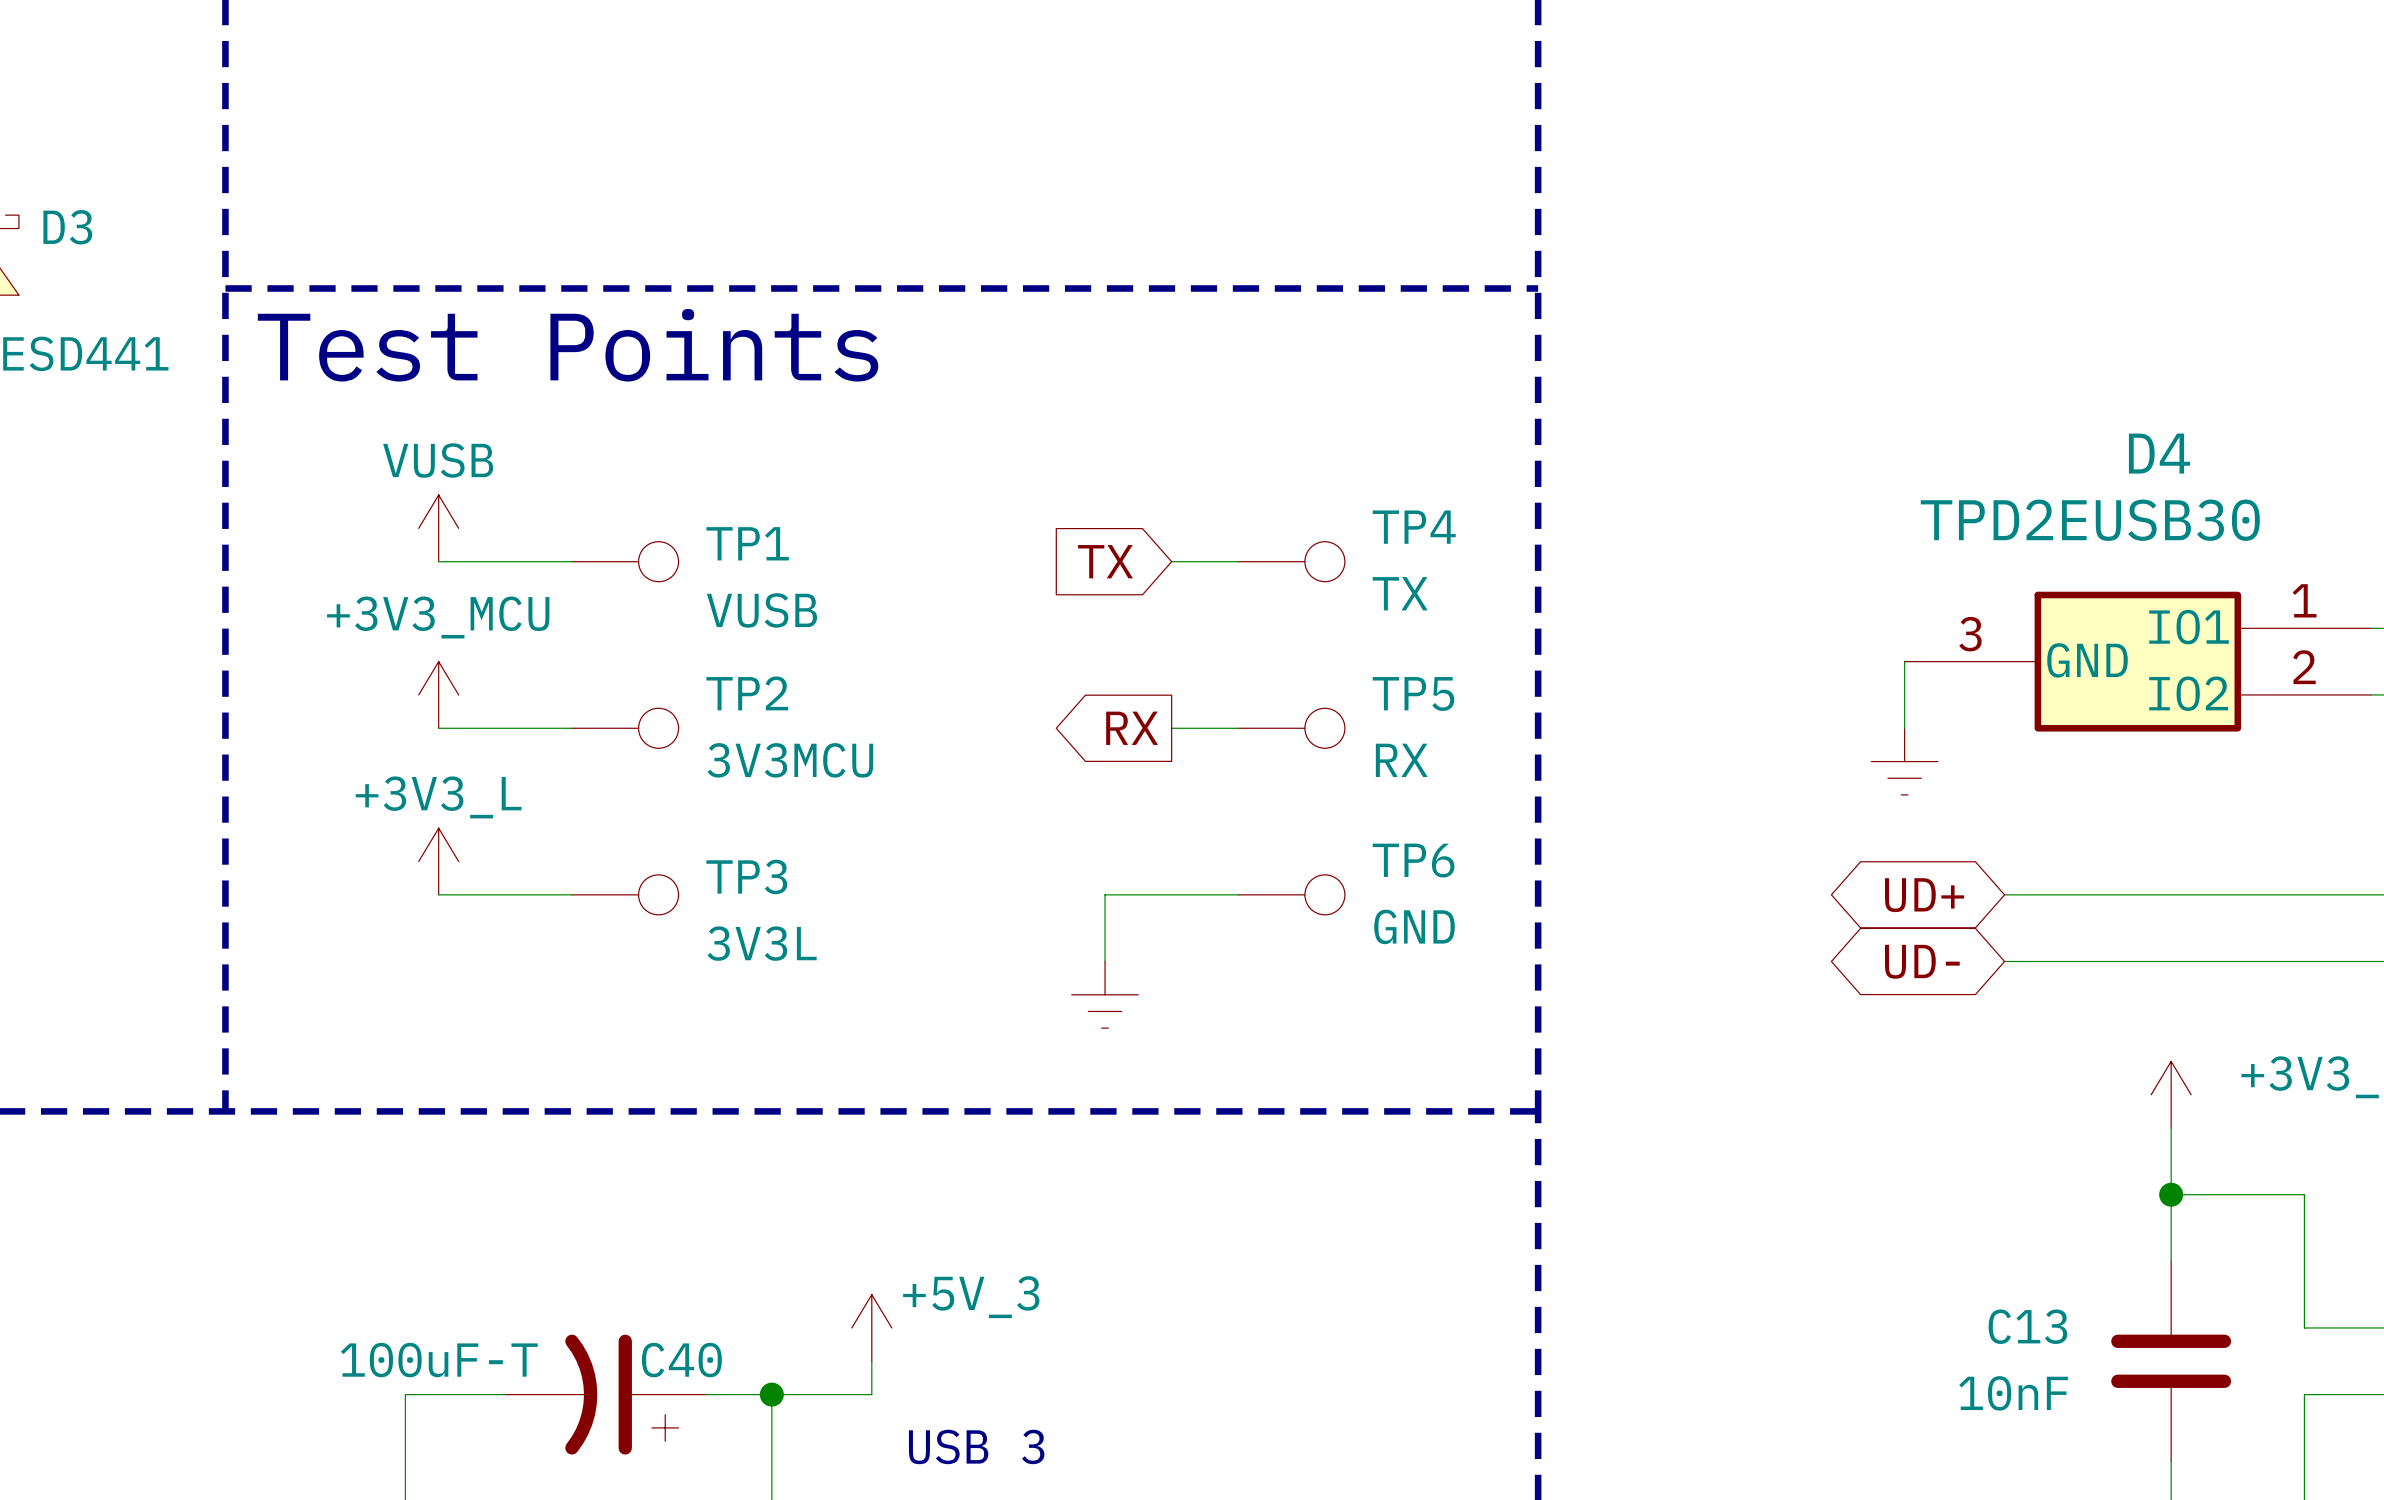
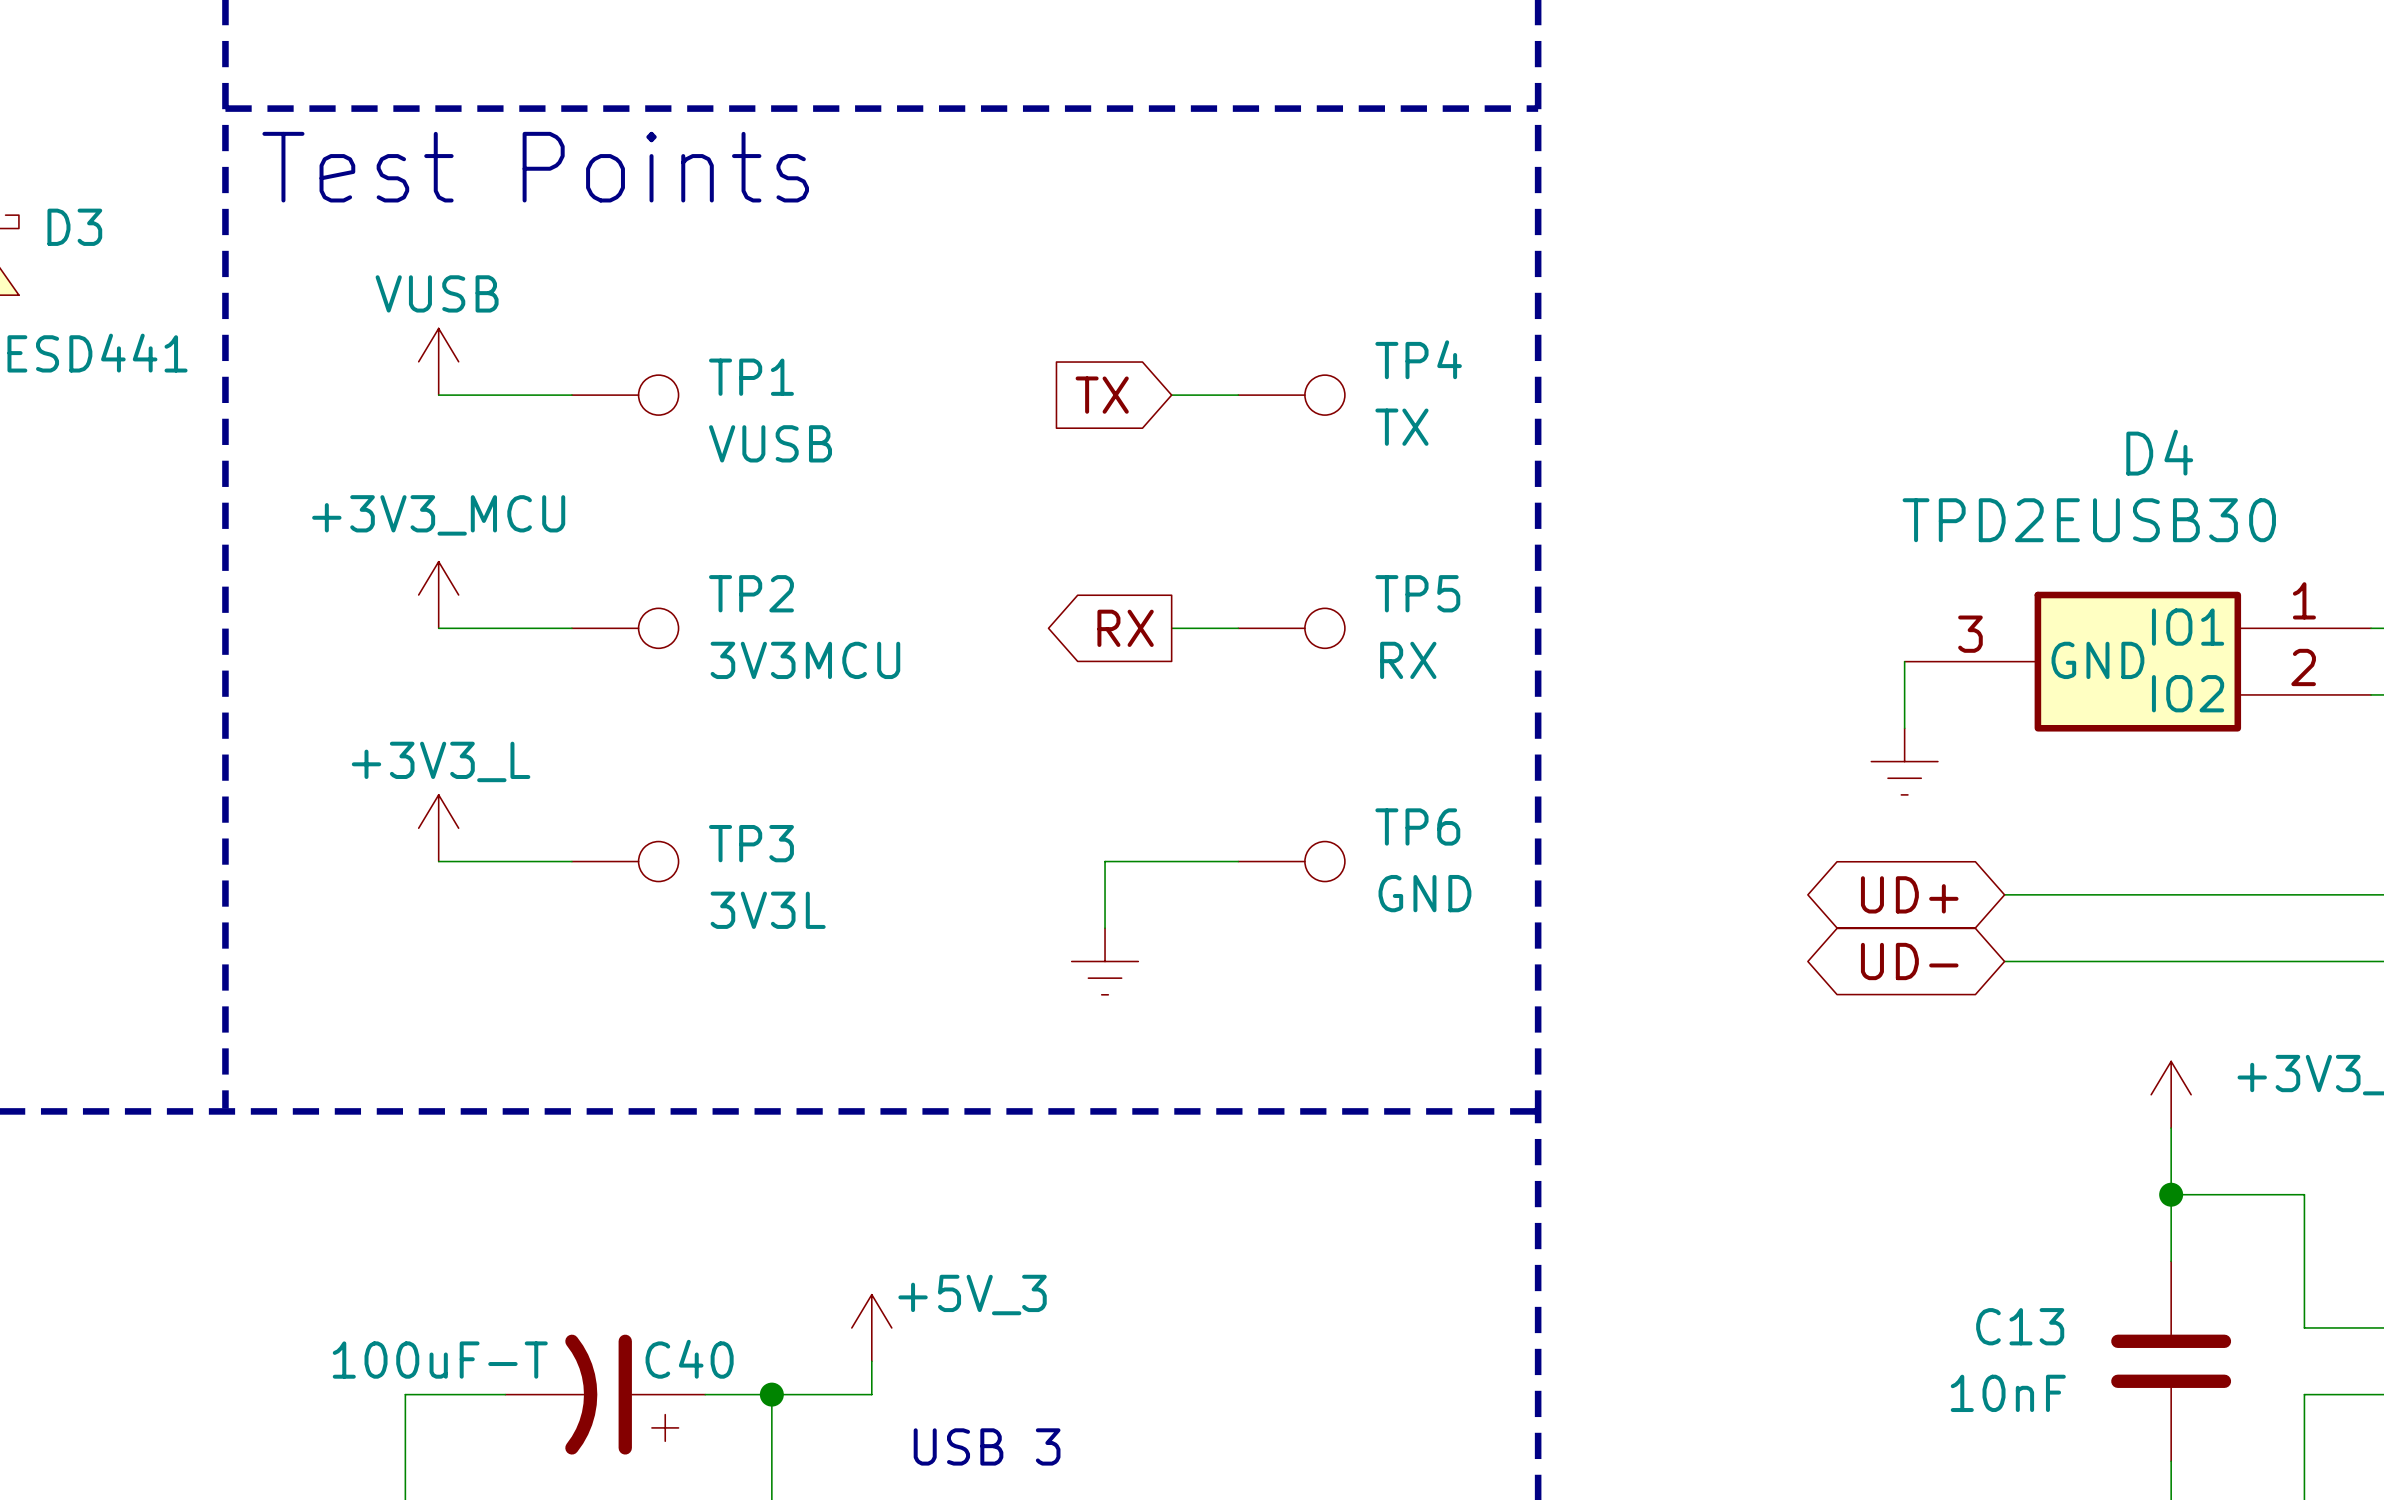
line: (225, 288) (1538, 288) -> (225, 108) (1538, 108)
text position: Test Points (568, 345) -> Test Points (535, 167)
power symbol position: VUSB (438, 528) -> VUSB (438, 361)
wire: (438, 561) (571, 561) -> (438, 628) (571, 628)
TP1 position: (625, 561) -> (625, 395)
global label position: TX (1105, 561) -> TX (1102, 395)
wire: (1171, 561) (1238, 561) -> (1171, 628) (1238, 628)
TP4 position: (1291, 561) -> (1291, 395)
power symbol position: +3V3_MCU (438, 694) -> +3V3_MCU (438, 595)
wire: (438, 728) (571, 728) -> (438, 395) (571, 395)
TP2 position: (625, 728) -> (625, 628)
global label position: RX (1132, 728) -> RX (1125, 628)
wire: (1171, 728) (1238, 728) -> (1171, 395) (1238, 395)
TP5 position: (1291, 728) -> (1291, 628)
power symbol position: +3V3_L (438, 861) -> +3V3_L (438, 828)
wire: (438, 894) (571, 894) -> (438, 861) (571, 861)
TP3 position: (625, 894) -> (625, 861)
wire: (1105, 894) (1238, 894) -> (1105, 894) (1105, 861) (1238, 861)
TP6 position: (1291, 894) -> (1291, 861)
power symbol position: (1105, 994) -> (1105, 961)

